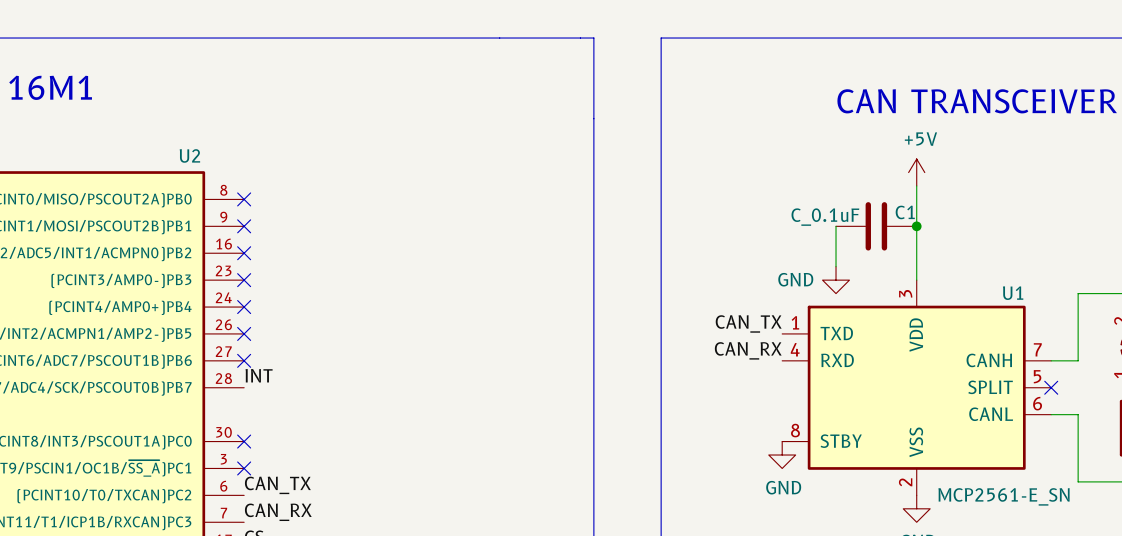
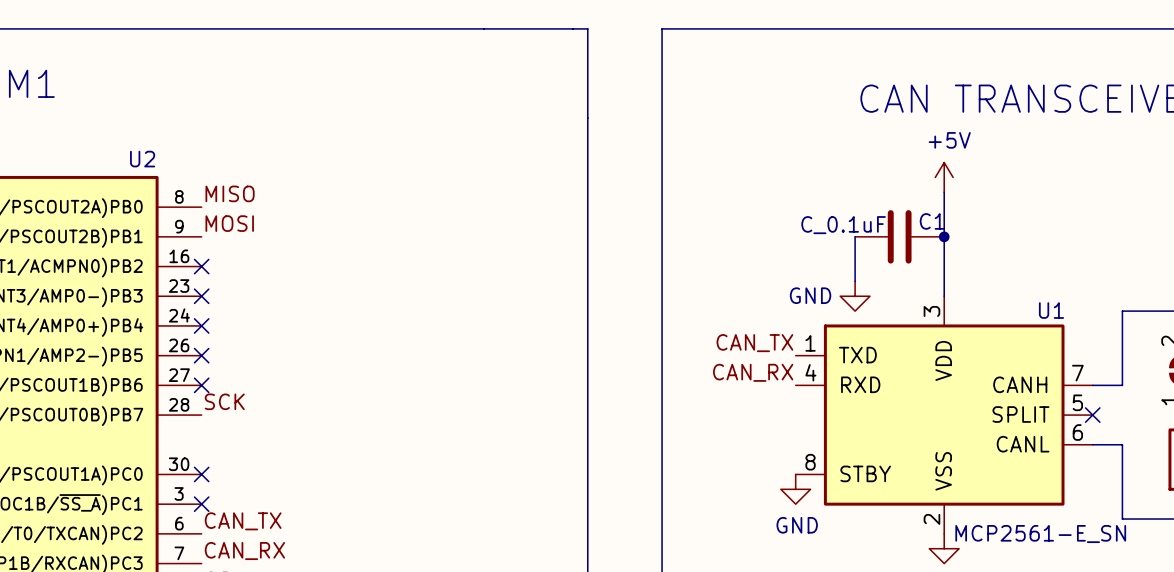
label: none -> MISO (230, 193)
no-connect mark: (244, 199) -> none
label: none -> MOSI (229, 223)
no-connect mark: (244, 226) -> none
label: INT (259, 375) -> SCK (224, 401)

